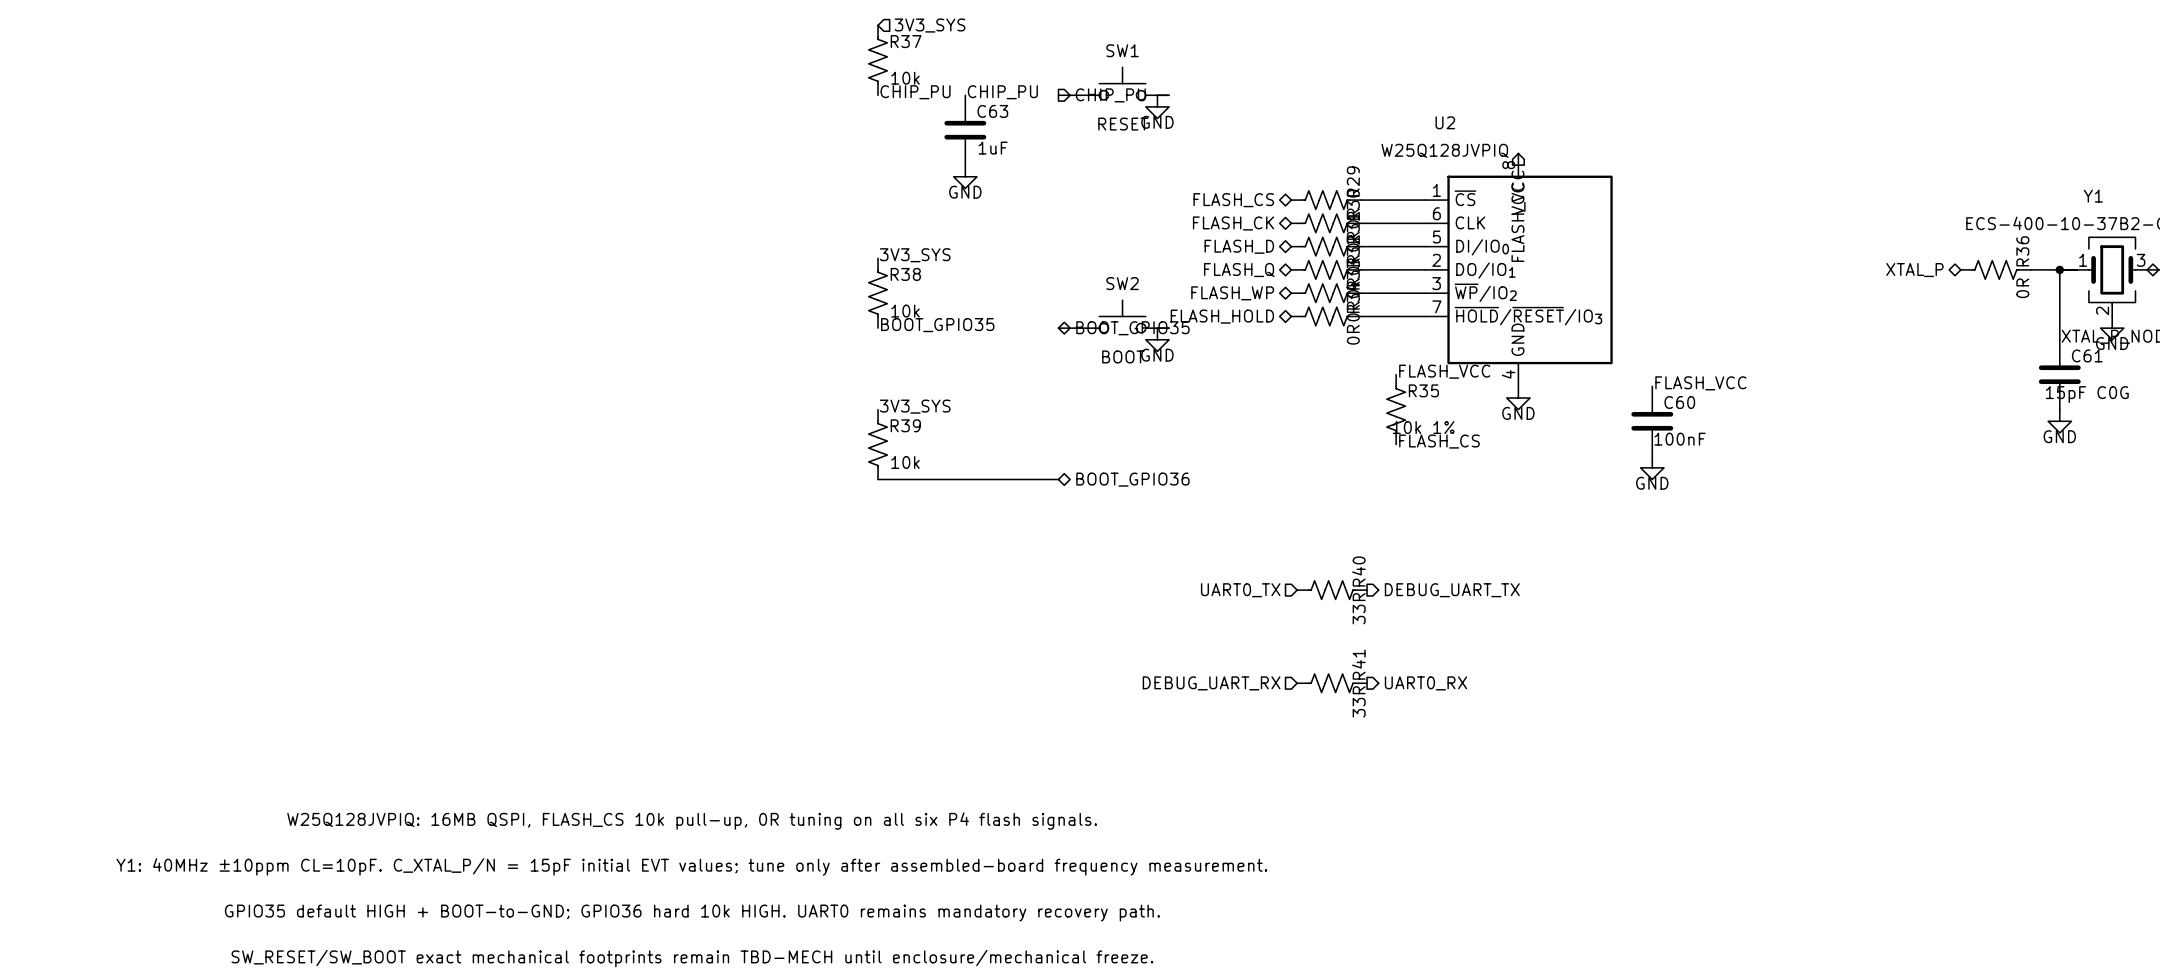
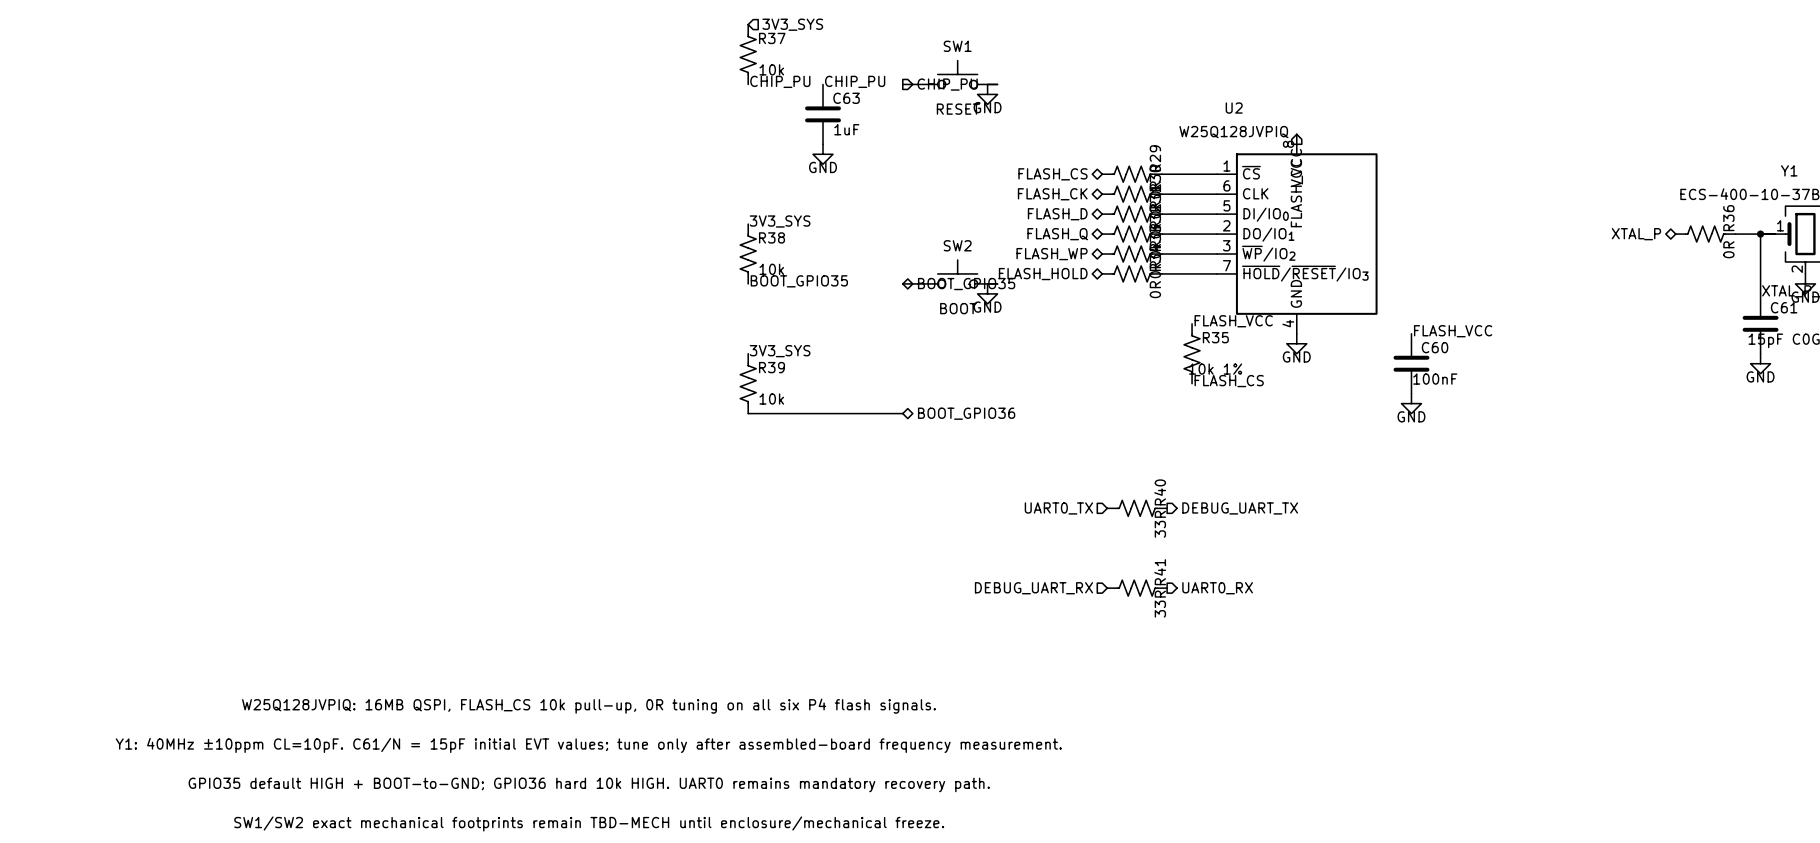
text: Y1: 40MHz ±10ppm CL=10pF. C_XTAL_P/N = 15pF initial EVT values; tune only after assembled-board frequency measurement. (691, 866) -> Y1: 40MHz ±10ppm CL=10pF. C61/N = 15pF initial EVT values; tune only after assembled-board frequency measurement. (588, 745)
text: SW_RESET/SW_BOOT exact mechanical footprints remain TBD-MECH until enclosure/mechanical freeze. (692, 958) -> SW1/SW2 exact mechanical footprints remain TBD-MECH until enclosure/mechanical freeze. (589, 823)

